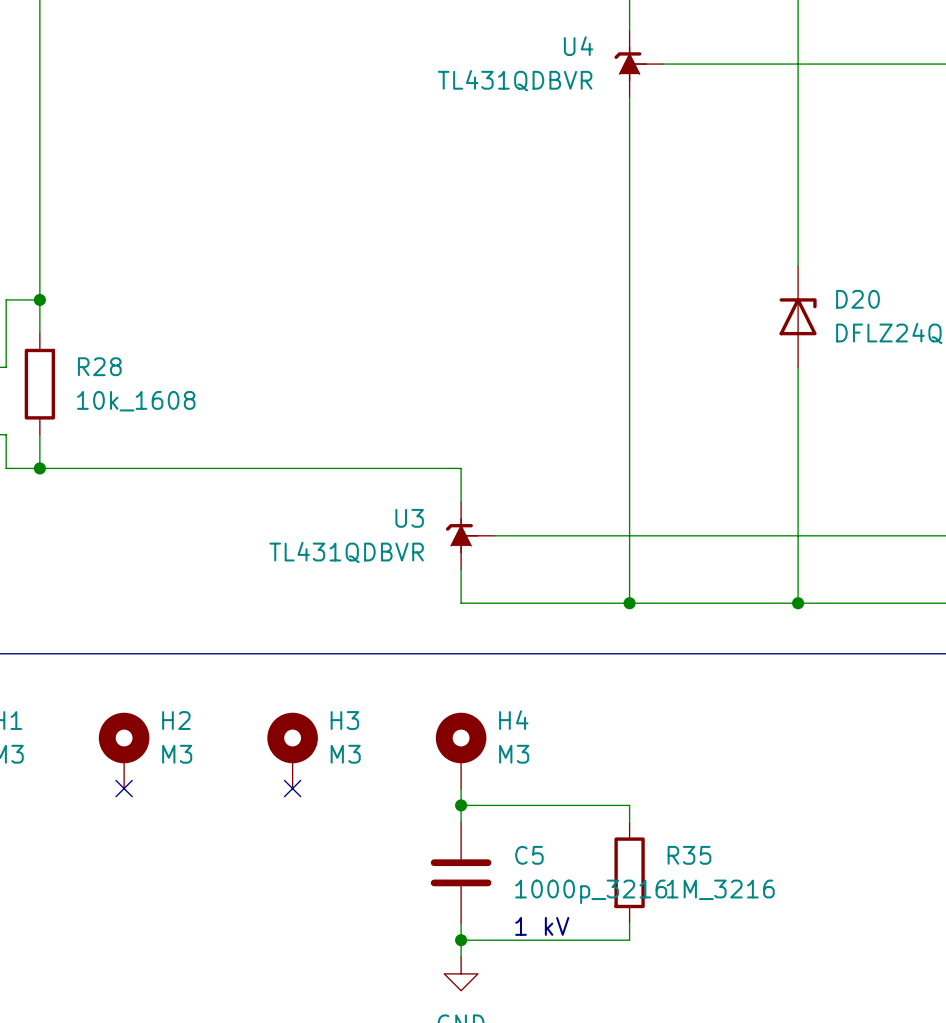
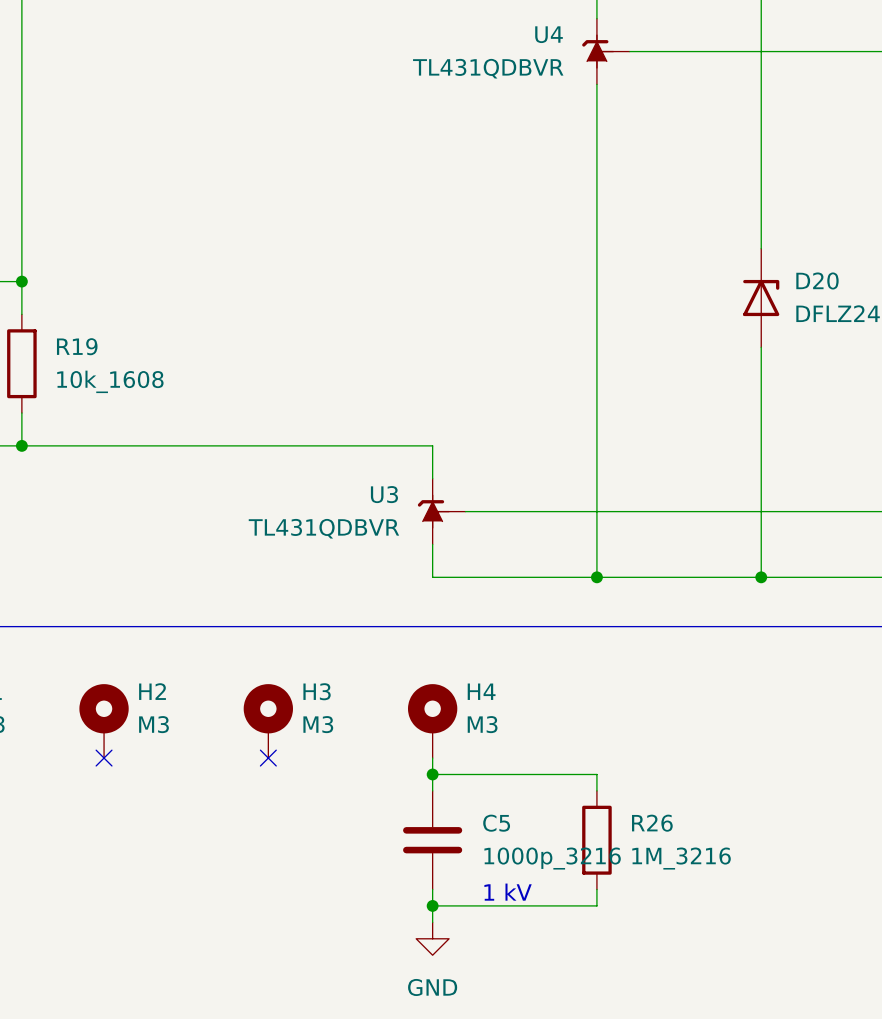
R28 name: R28 (99, 366) -> R19 (77, 346)
R35 name: R35 (689, 855) -> R26 (652, 823)

